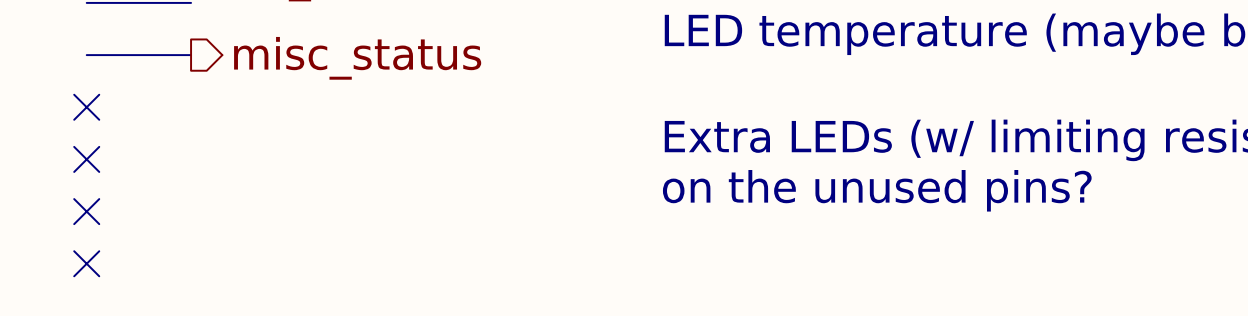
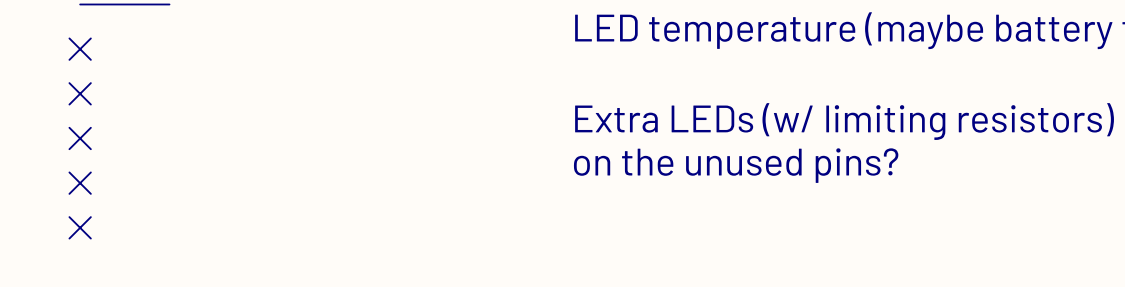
wire: (86, 55) (191, 55) -> none
no-connect mark: none -> (80, 49)
hierarchical label: misc_status (357, 58) -> none

